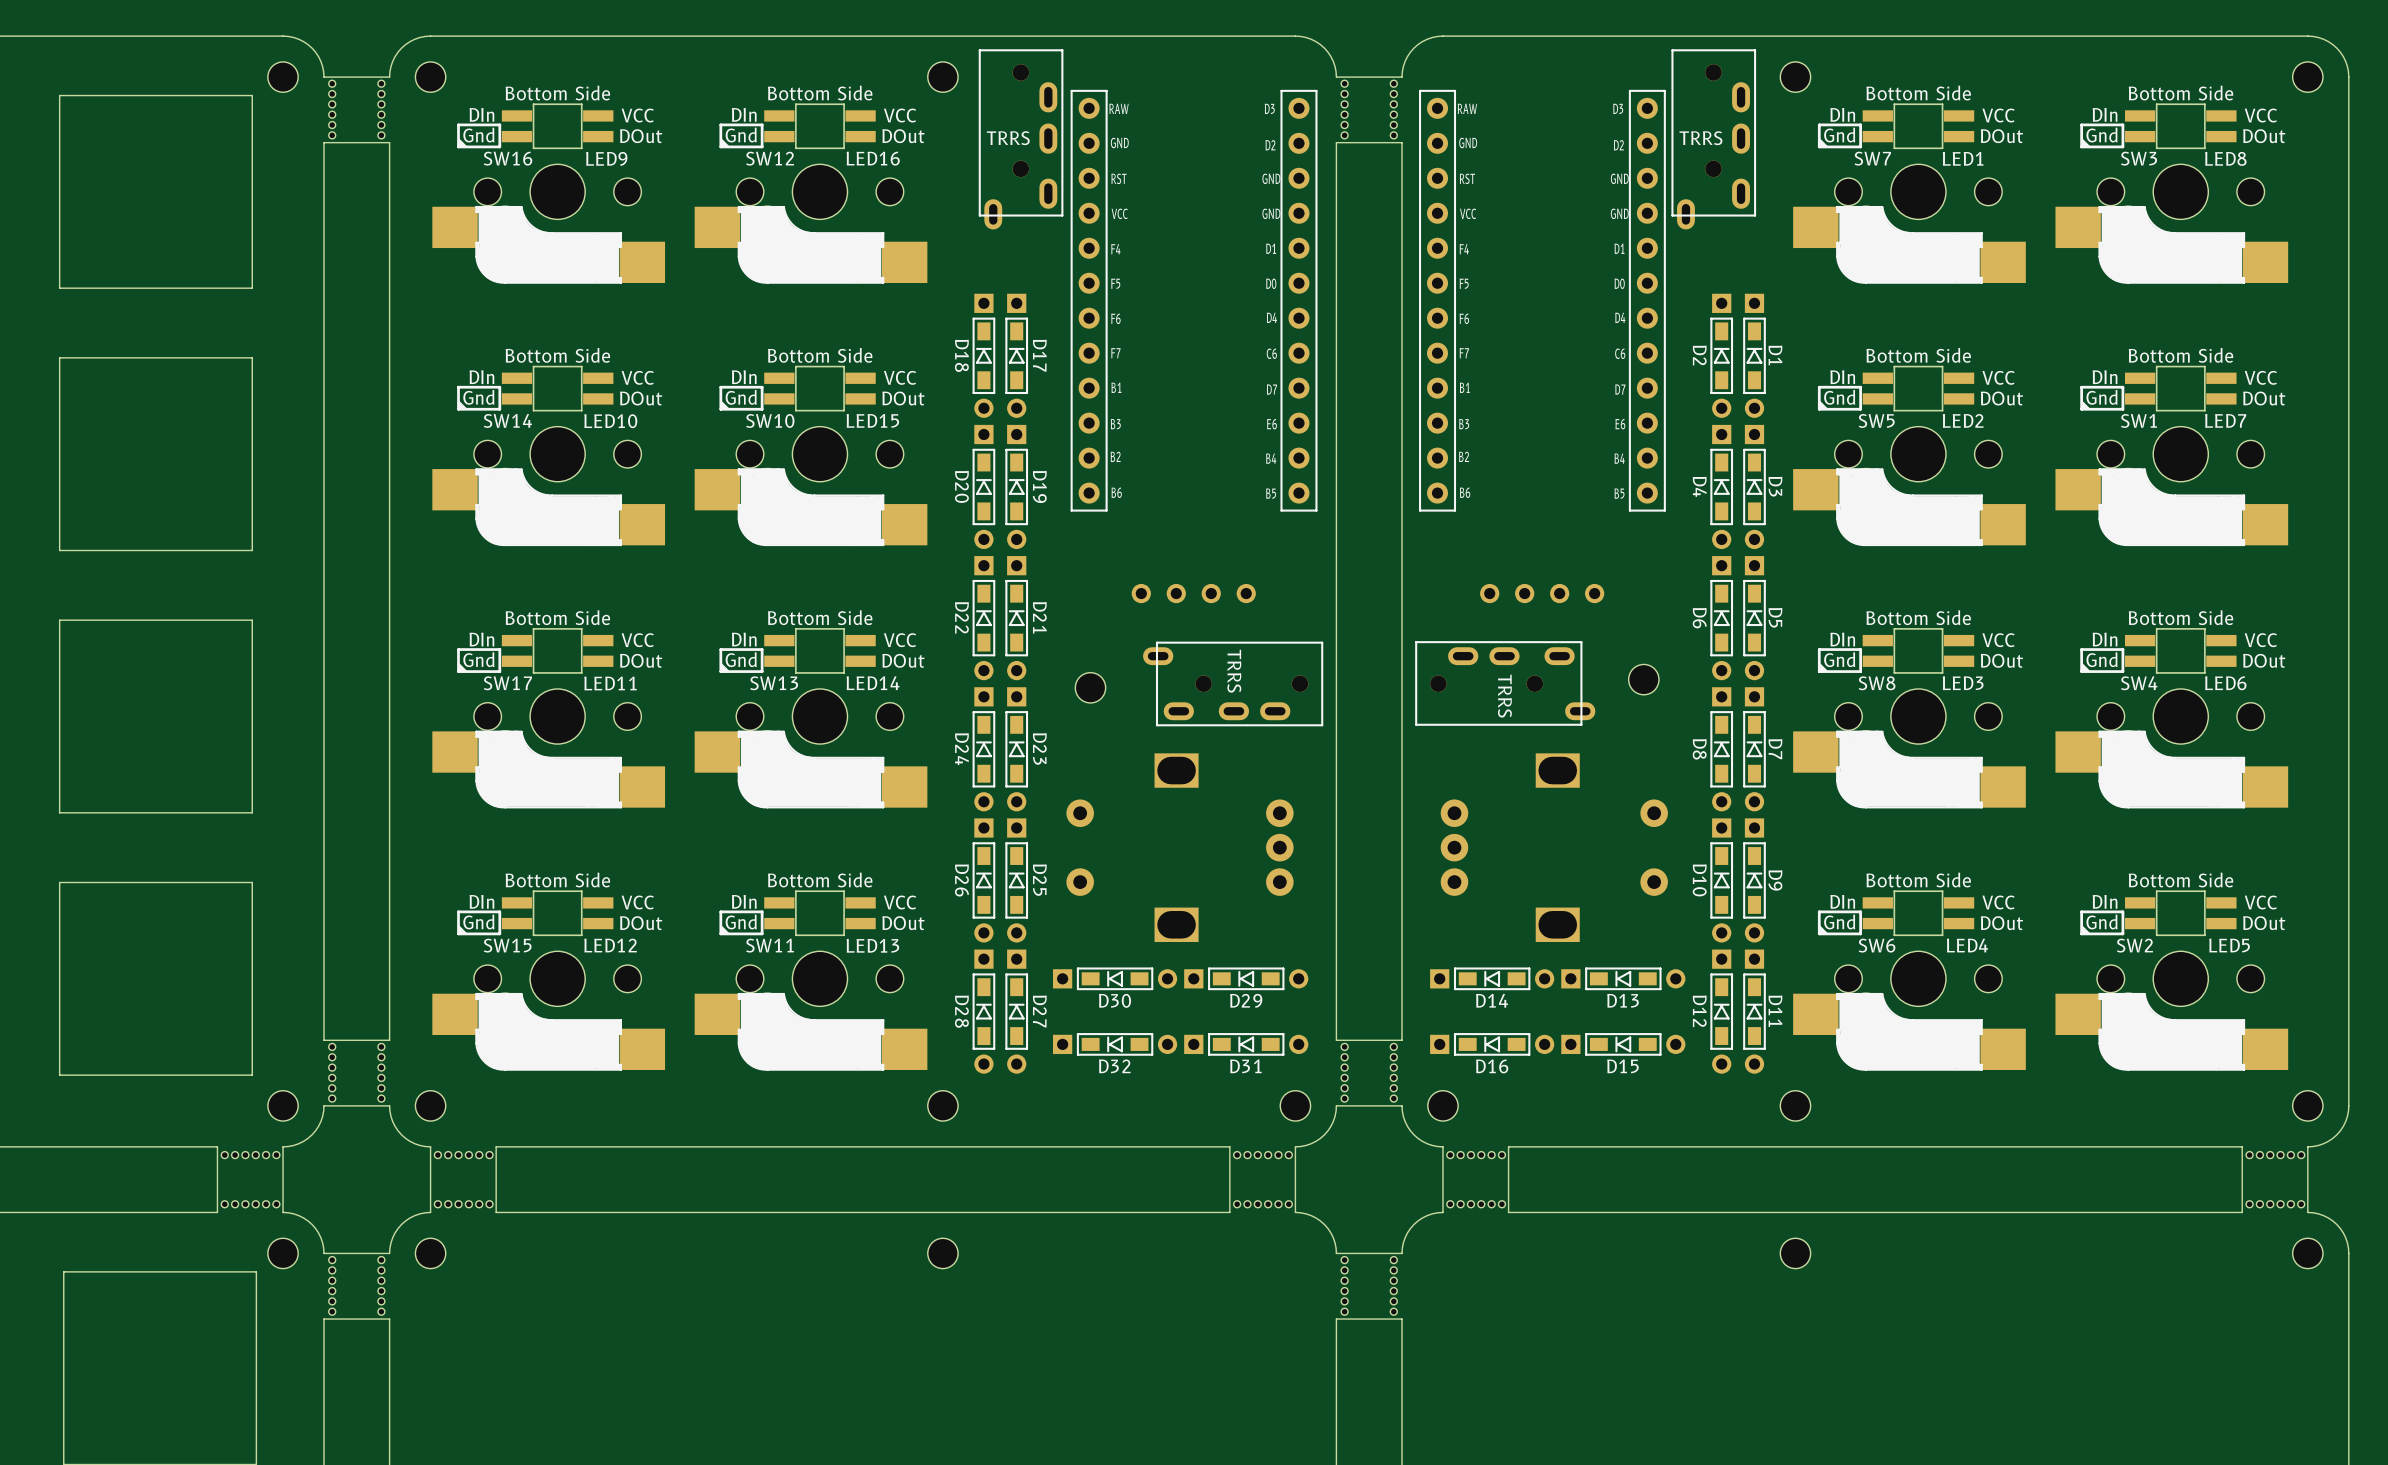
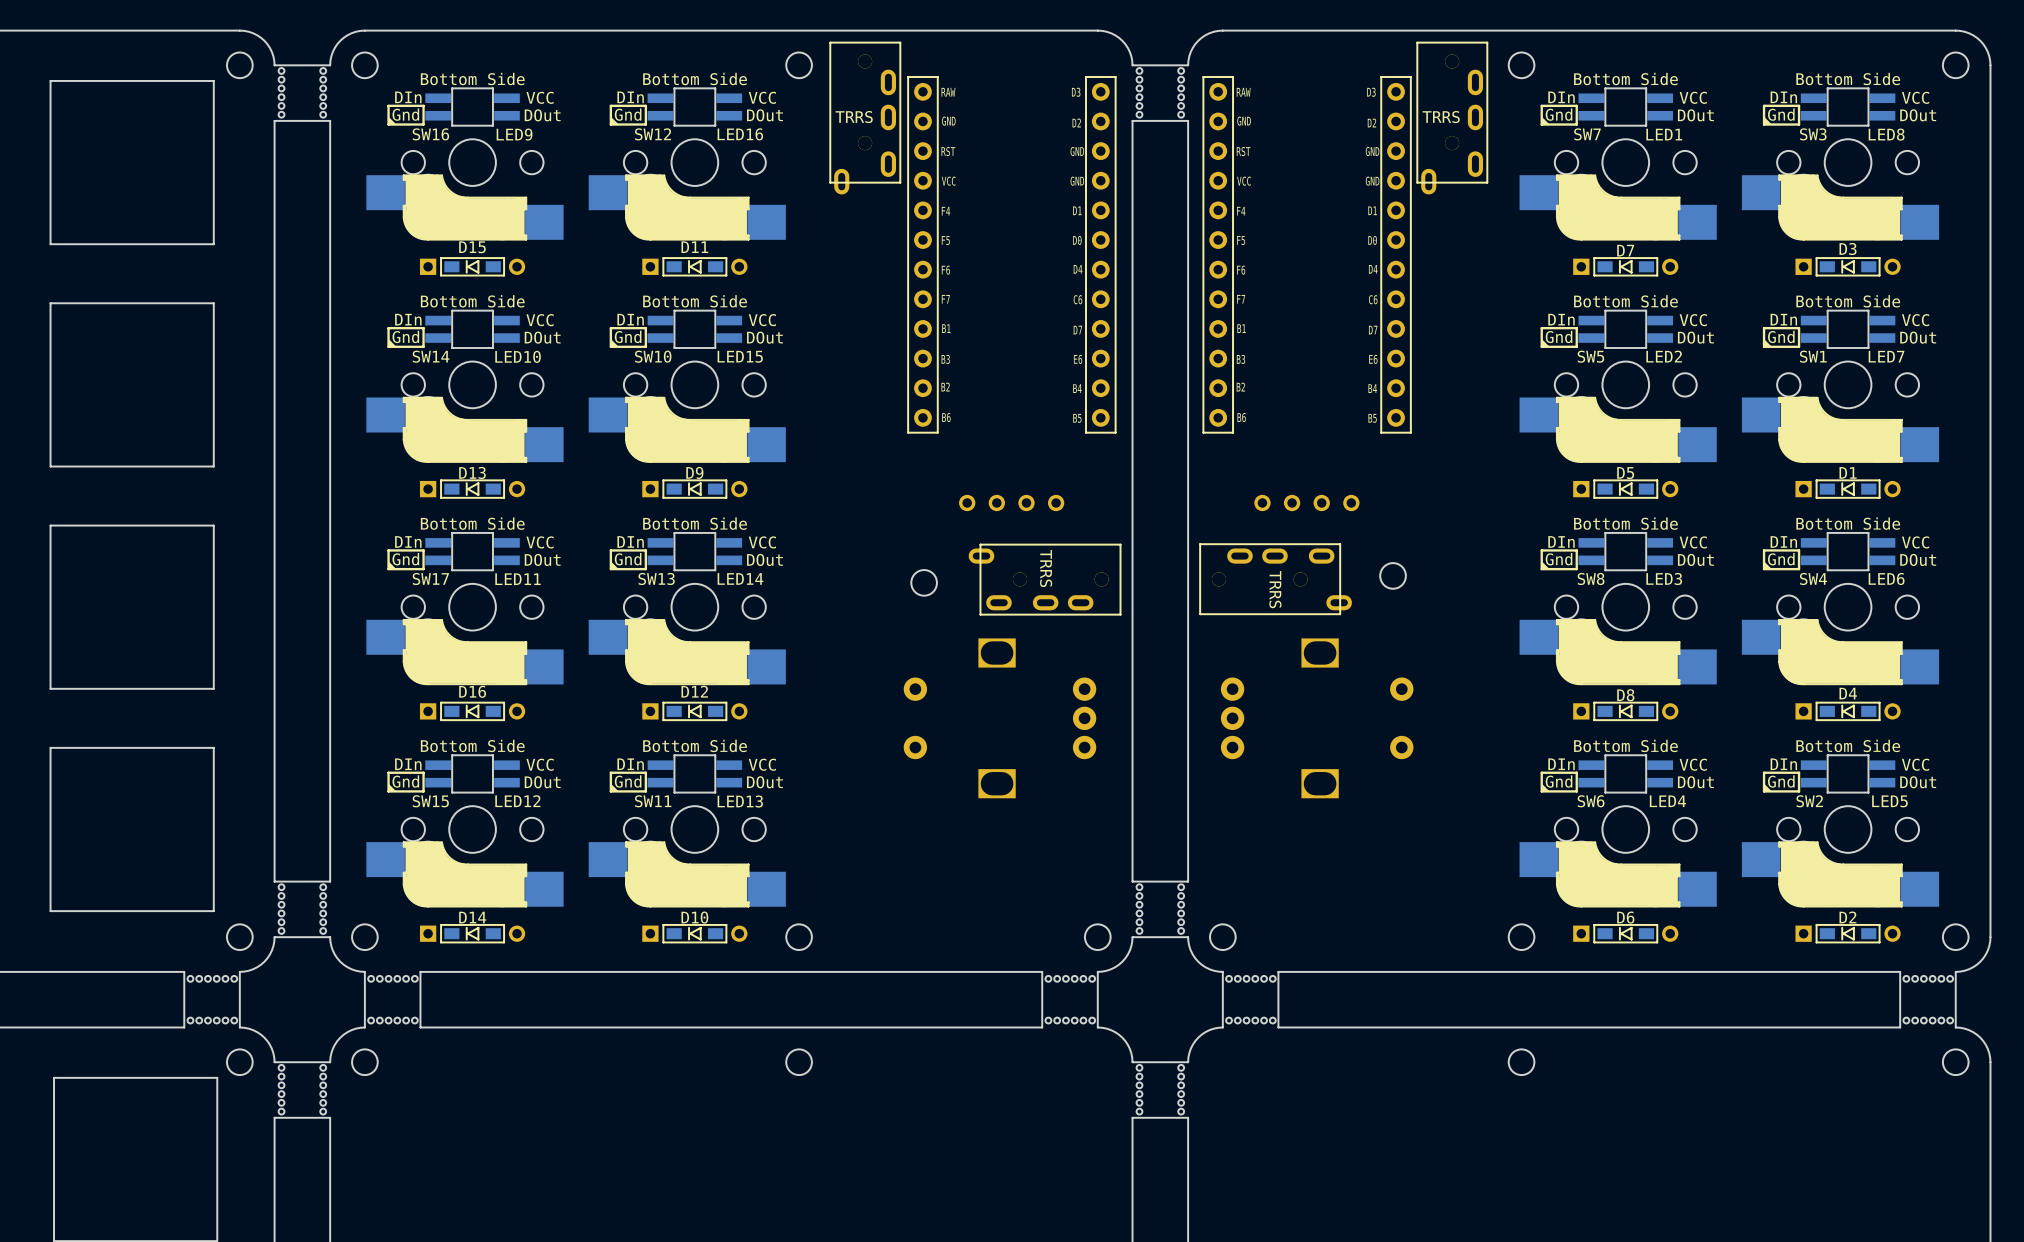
D18: (983, 355) -> none
D17: (1016, 355) -> none
D2 name position: D2 (1699, 355) -> D2 (1847, 917)
D2 rotation: 0° (1721, 355) -> 90° counterclockwise (1848, 933)
D2 position: (1721, 355) -> (1848, 933)
D1 rotation: 0° (1754, 355) -> 90° counterclockwise (1848, 489)
D1 position: (1754, 355) -> (1848, 489)
D20: (983, 486) -> none
D19: (1016, 486) -> none
D4 name position: D4 (1699, 486) -> D4 (1848, 693)
D4 rotation: 0° (1721, 486) -> 90° counterclockwise (1848, 711)
D4 position: (1721, 486) -> (1848, 711)
D3 rotation: 0° (1754, 486) -> 90° counterclockwise (1848, 266)
D3 position: (1754, 486) -> (1848, 266)
D22: (983, 618) -> none
D21: (1016, 618) -> none
D6 name position: D6 (1699, 618) -> D6 (1625, 917)
D6 rotation: 0° (1721, 618) -> 90° counterclockwise (1625, 933)
D6 position: (1721, 618) -> (1625, 933)
D5 rotation: 0° (1754, 618) -> 90° counterclockwise (1625, 489)
D5 position: (1754, 618) -> (1625, 489)
D24: (983, 749) -> none
D23: (1016, 749) -> none
D8 name position: D8 (1699, 749) -> D8 (1625, 695)
D8 rotation: 0° (1721, 749) -> 90° counterclockwise (1625, 711)
D8 position: (1721, 749) -> (1625, 711)
D7 rotation: 0° (1754, 749) -> 90° counterclockwise (1625, 266)
D7 position: (1754, 749) -> (1625, 266)
D26: (983, 880) -> none
D25: (1016, 880) -> none
D10 name position: D10 (1699, 880) -> D10 (694, 917)
D10 rotation: 0° (1721, 880) -> 90° counterclockwise (694, 933)
D10 position: (1721, 880) -> (694, 933)
D9 rotation: 0° (1754, 880) -> 90° counterclockwise (694, 489)
D9 position: (1754, 880) -> (694, 489)
D30: (1115, 978) -> none
D29: (1246, 978) -> none
D14 position: (1492, 978) -> (472, 933)
D13 position: (1623, 978) -> (472, 489)
D14 name position: D14 (1492, 1000) -> D14 (472, 917)
D13 name position: D13 (1623, 1000) -> D13 (472, 472)
D28: (983, 1011) -> none
D27: (1016, 1011) -> none
D12 name position: D12 (1699, 1011) -> D12 (694, 691)
D12 rotation: 0° (1721, 1011) -> 90° counterclockwise (694, 711)
D12 position: (1721, 1011) -> (694, 711)
D11 rotation: 0° (1754, 1011) -> 90° counterclockwise (694, 266)
D11 position: (1754, 1011) -> (694, 266)
D32: (1115, 1044) -> none
D31: (1246, 1044) -> none
D16 position: (1492, 1044) -> (472, 711)
D15 position: (1623, 1044) -> (472, 266)
D16 name position: D16 (1492, 1066) -> D16 (472, 691)
D15 name position: D15 (1622, 1066) -> D15 (472, 247)

